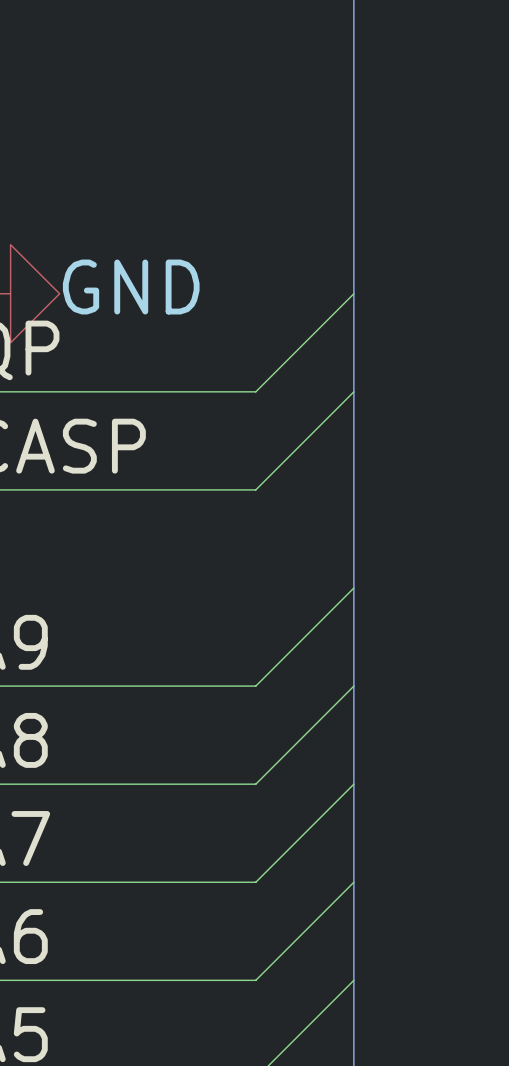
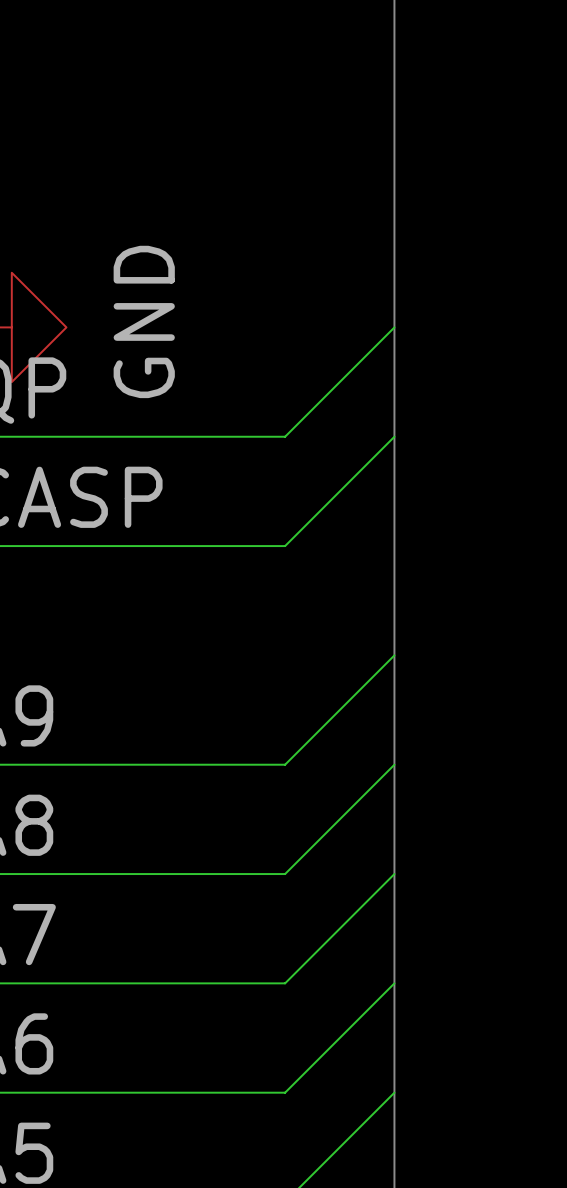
power symbol text rotation: 0° (131, 287) -> 90° counterclockwise (144, 321)

